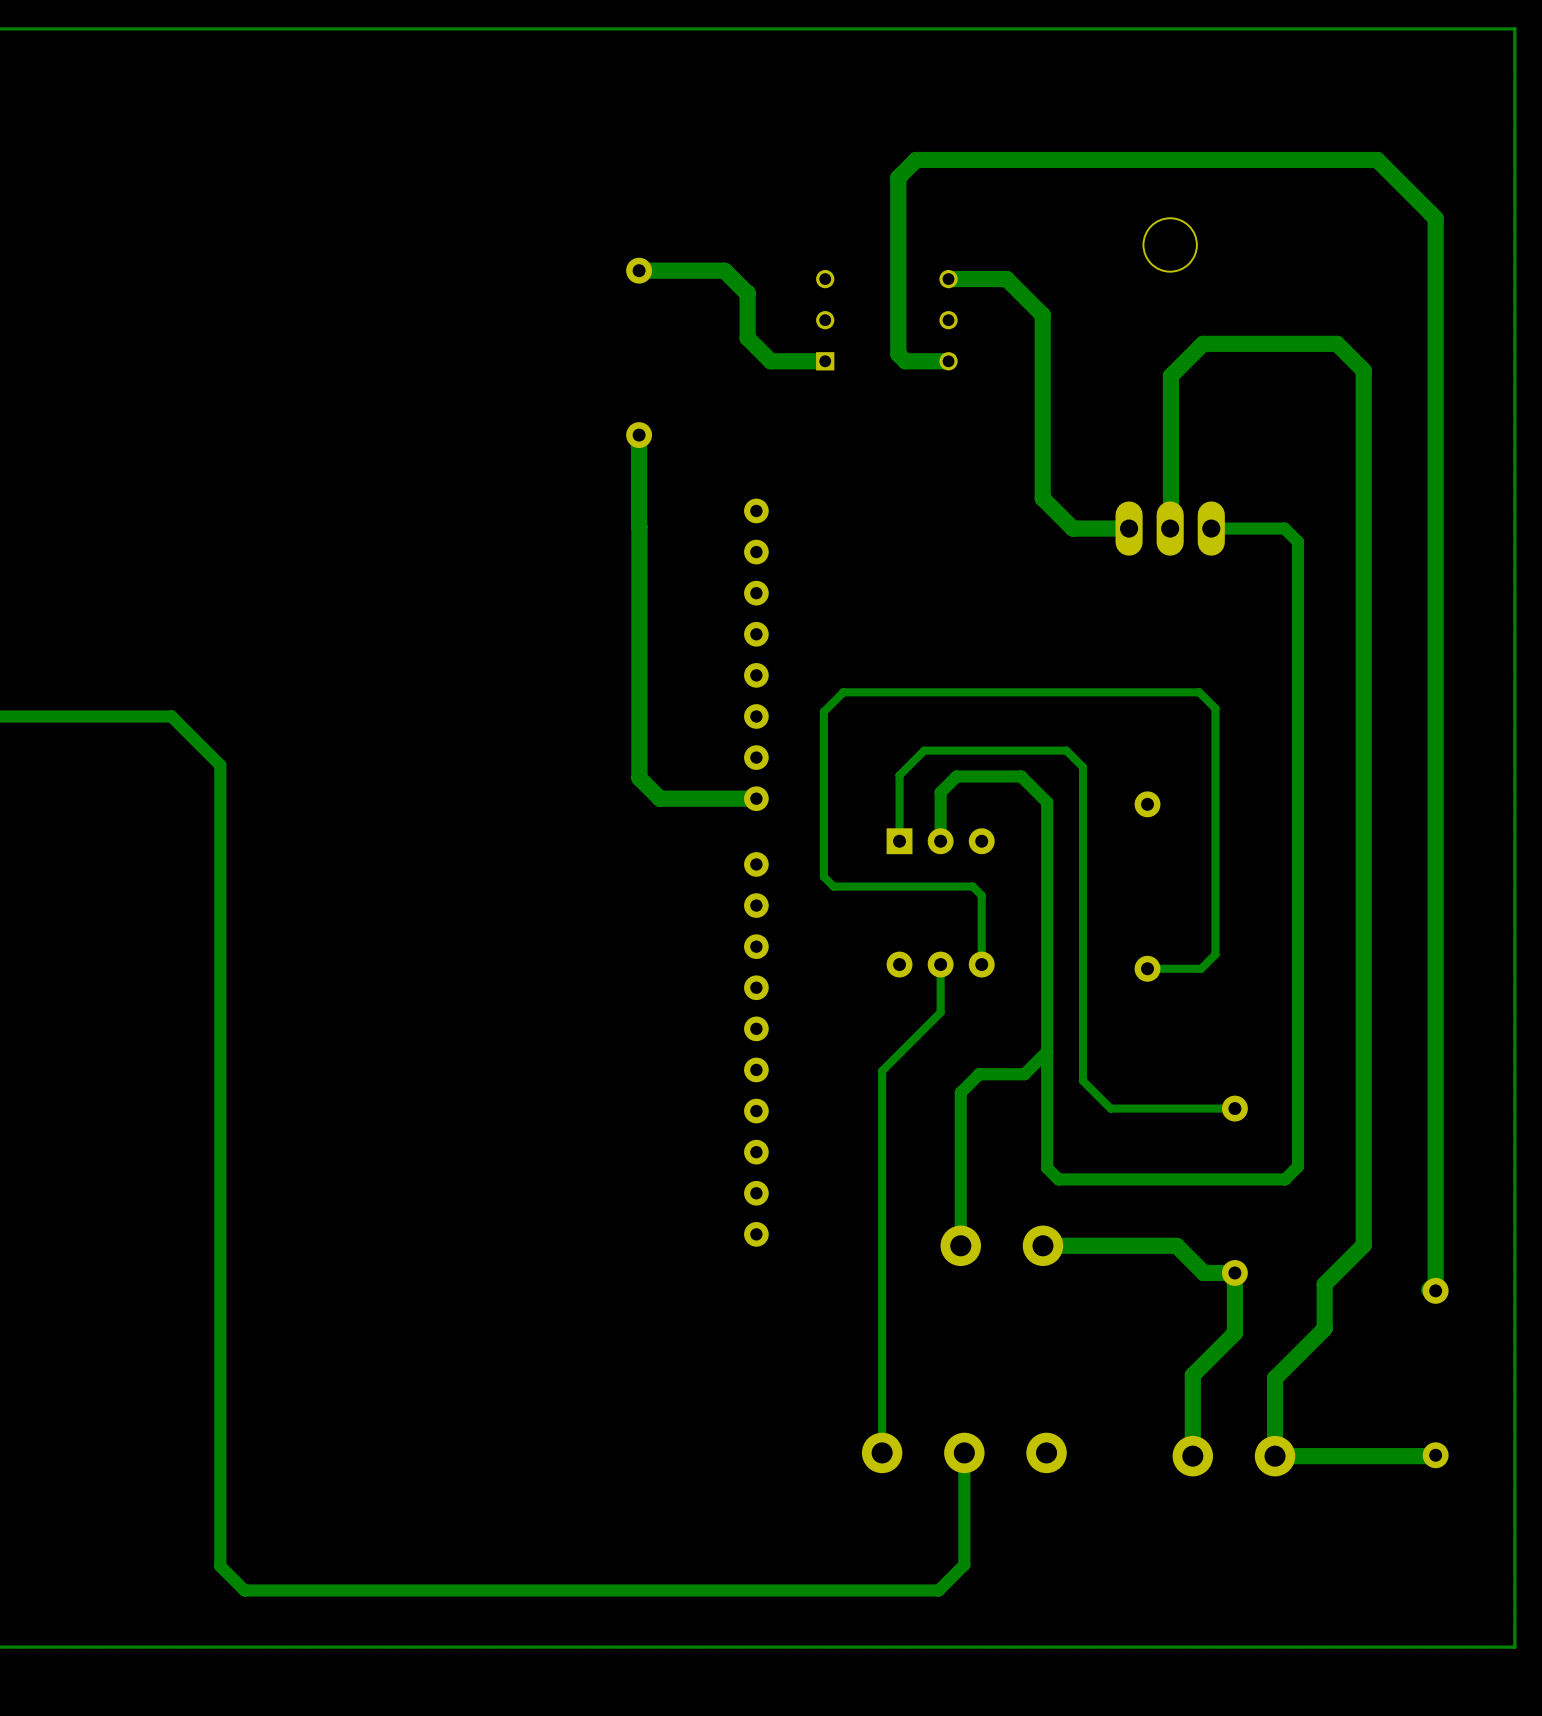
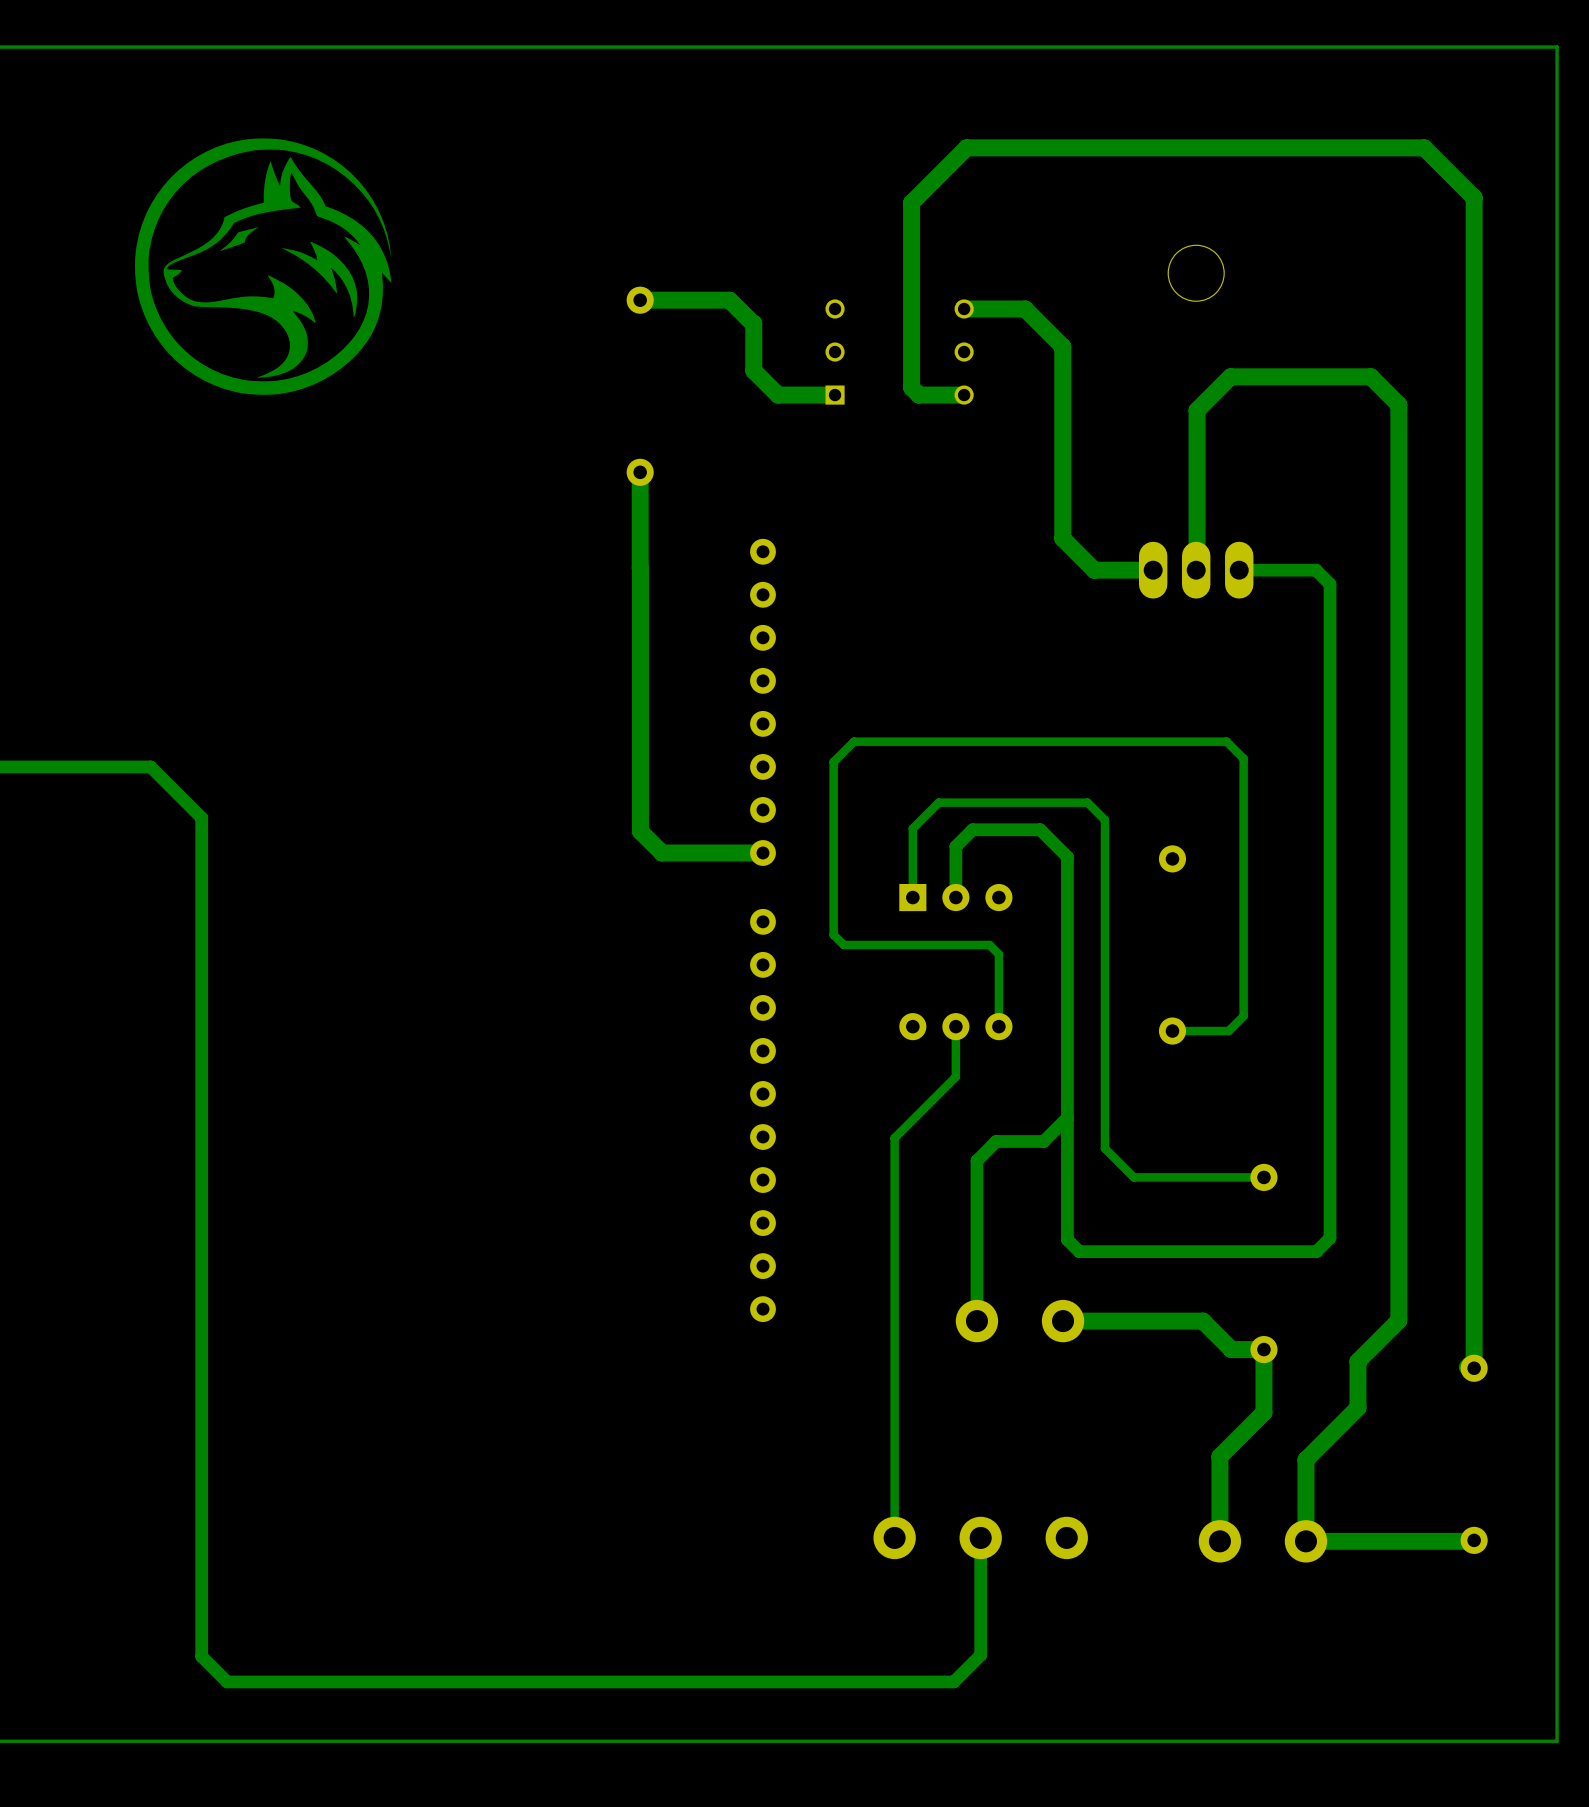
drawing: none -> [135, 138, 392, 395]
bottom track: (916, 159) (1377, 159) (1435, 218) -> (930, 184) (966, 147) (1424, 147) (1474, 197) (1474, 245)

